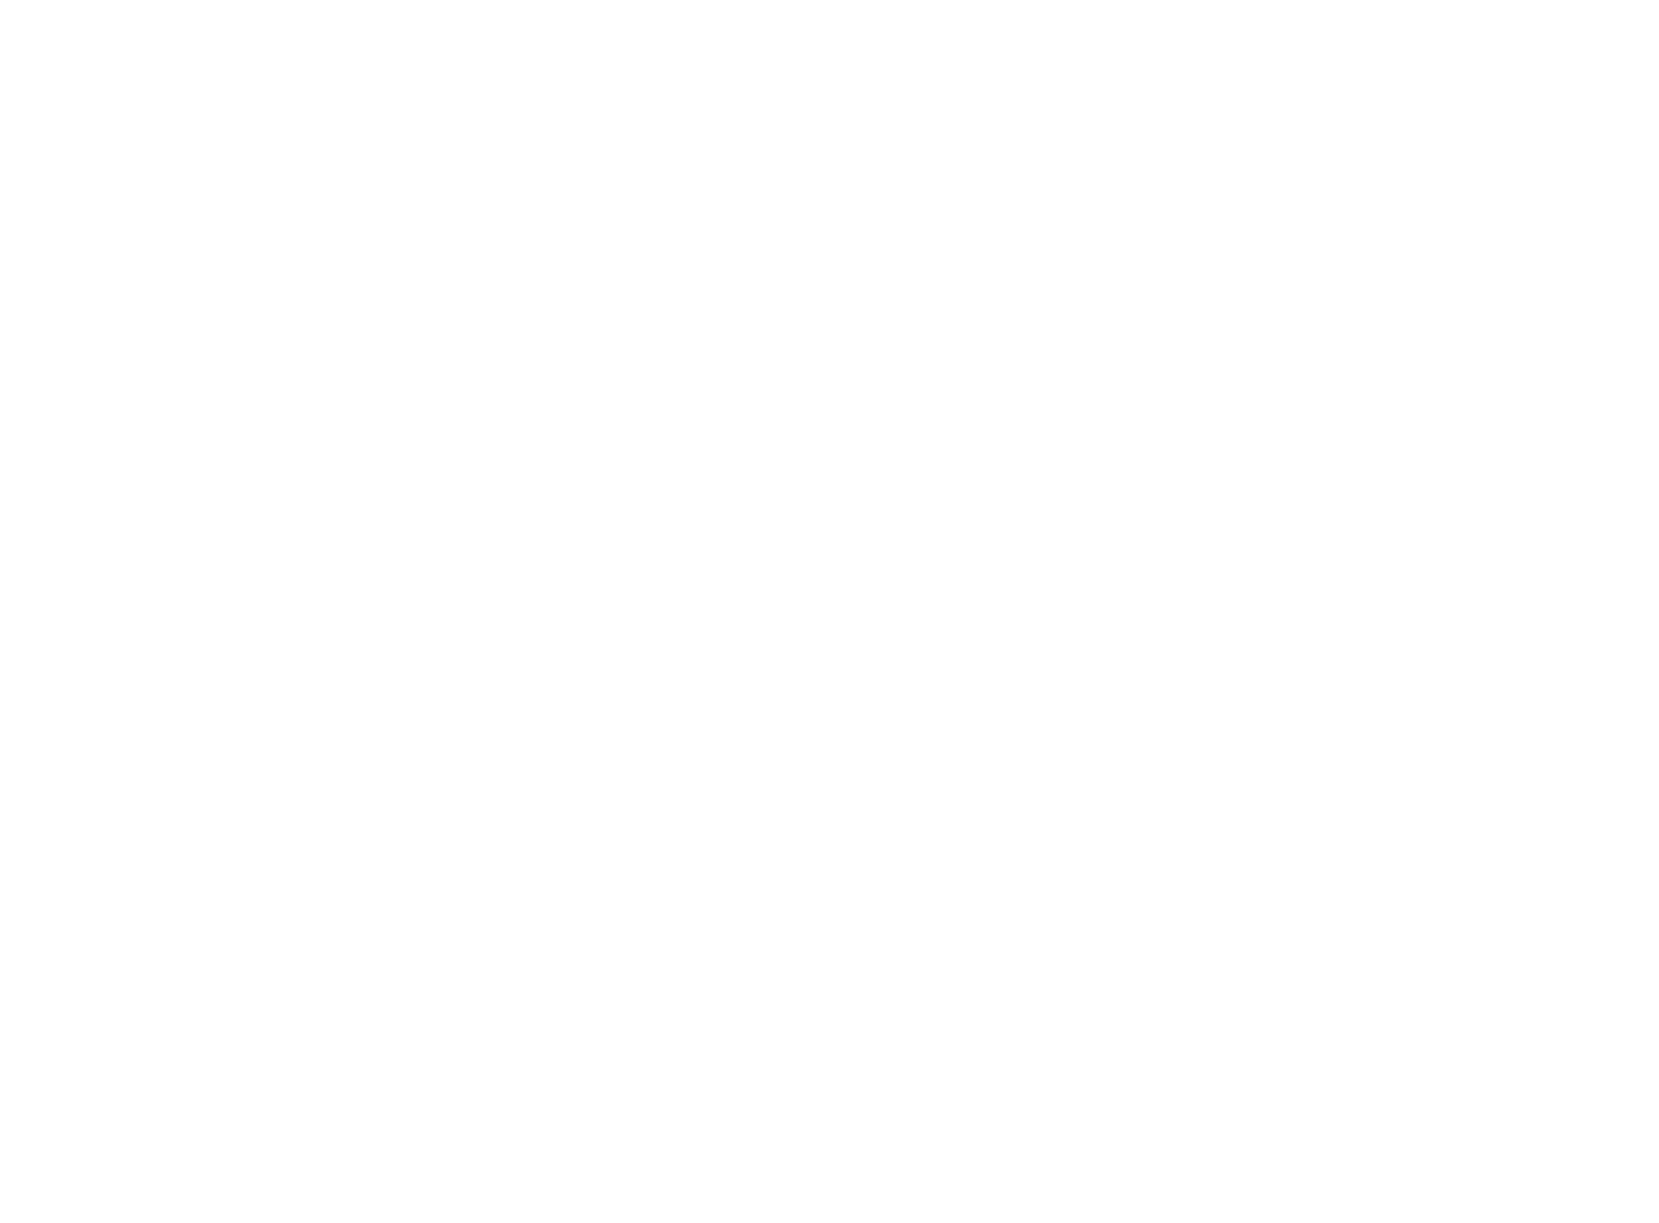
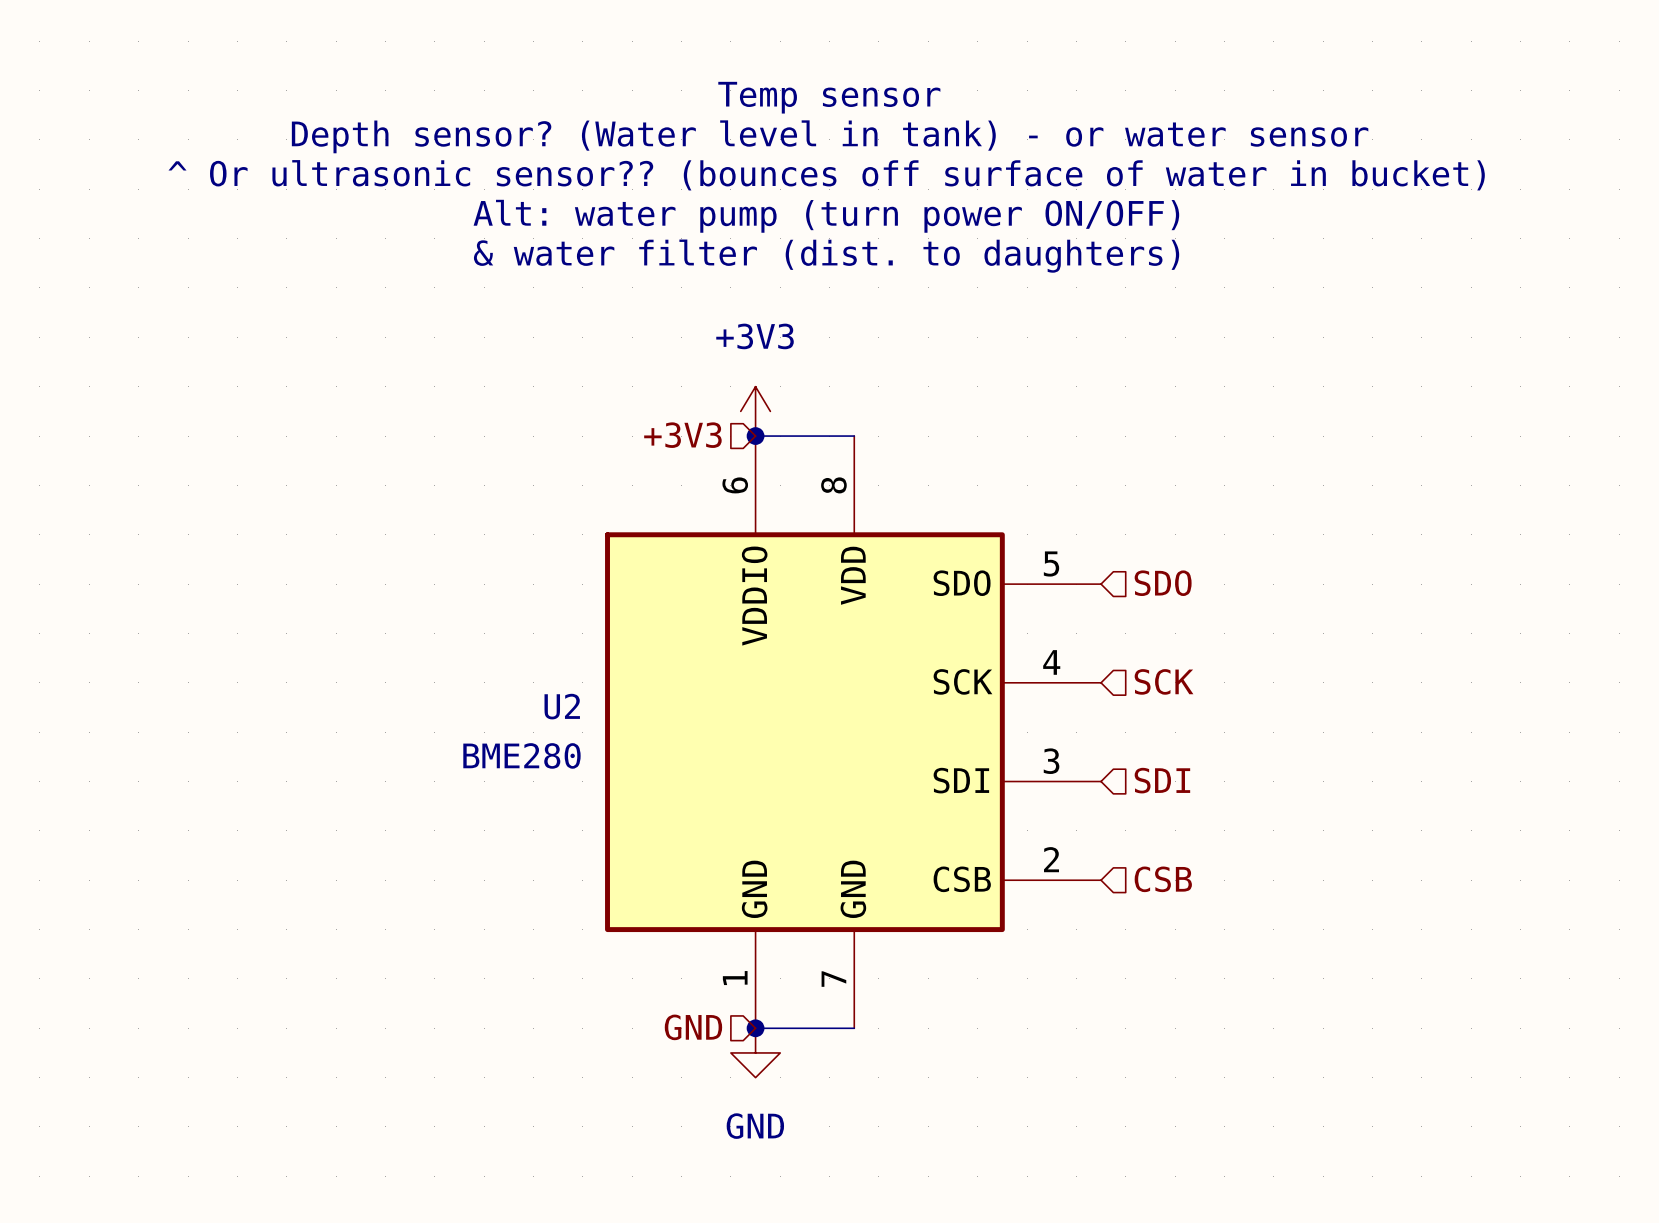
text: none -> Temp sensor (829, 97)
text: none -> Depth sensor? (Water level in tank) - or water sensor (830, 136)
text: none -> ^ Or ultrasonic sensor?? (bounces off surface of water in bucket) (826, 175)
text: none -> Alt: water pump (turn power ON/OFF) (826, 216)
text: none -> & water filter (dist. to daughters) (826, 256)
power symbol: none -> +3V3 (755, 411)
hierarchical label: none -> +3V3 (682, 435)
wire: none -> (755, 436) (854, 436)
junction: none -> (755, 436)
hierarchical label: none -> SDO (1163, 583)
hierarchical label: none -> SCK (1164, 681)
U2: none -> BME280 (853, 732)
hierarchical label: none -> SDI (1162, 780)
hierarchical label: none -> CSB (1163, 879)
hierarchical label: none -> GND (693, 1027)
wire: none -> (755, 1028) (854, 1028)
junction: none -> (755, 1028)
power symbol: none -> GND (755, 1052)

